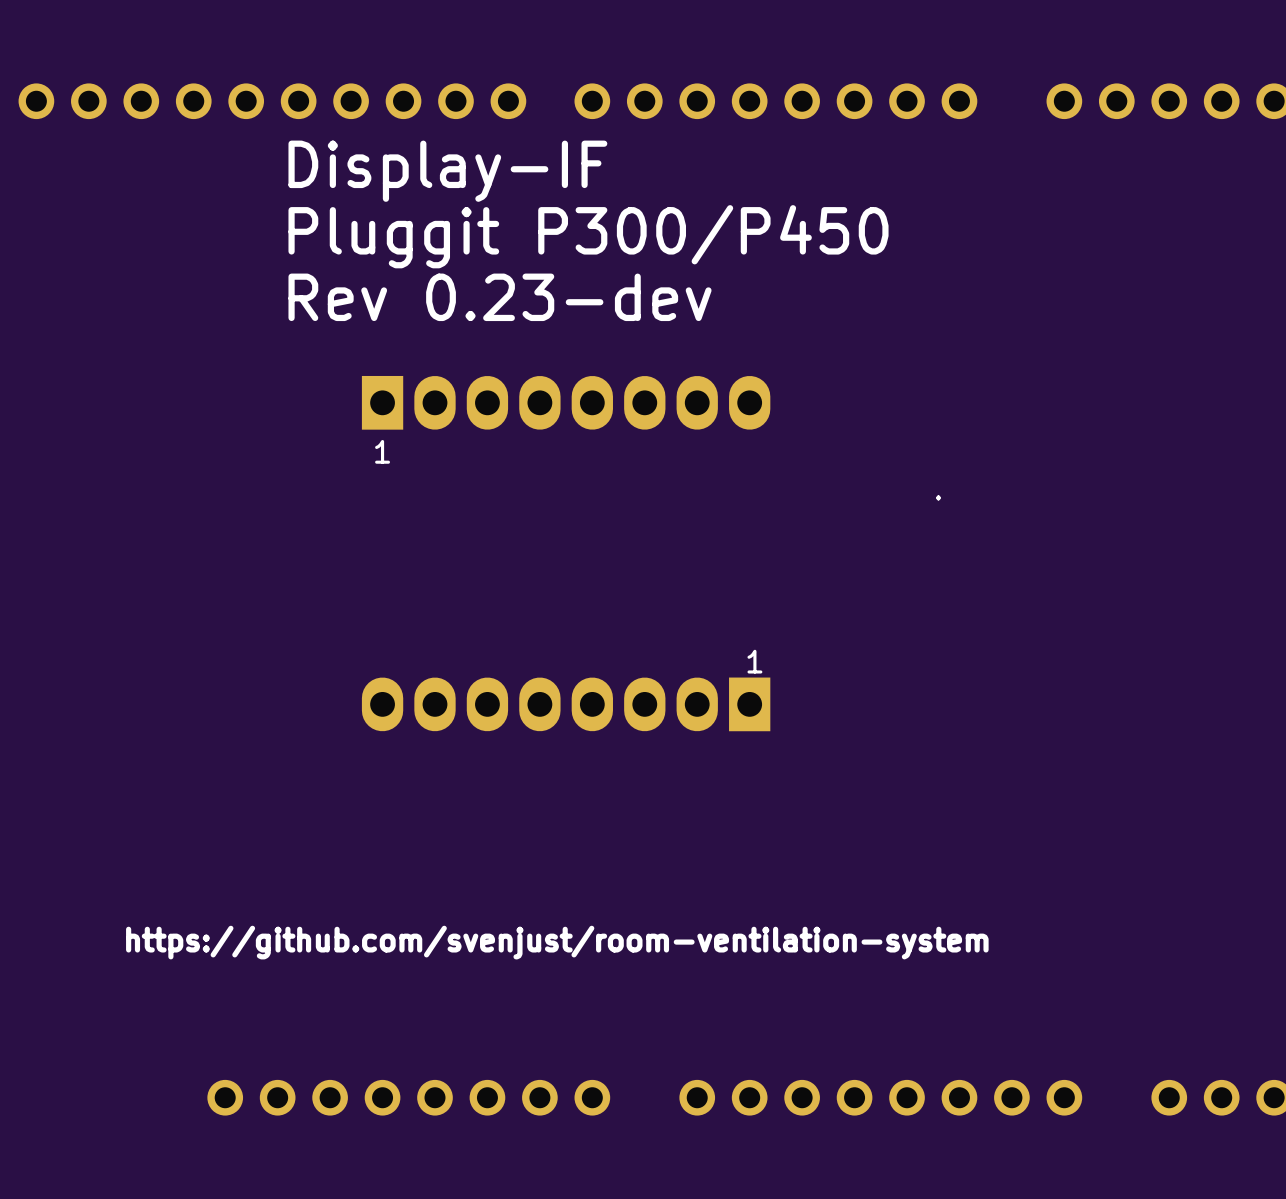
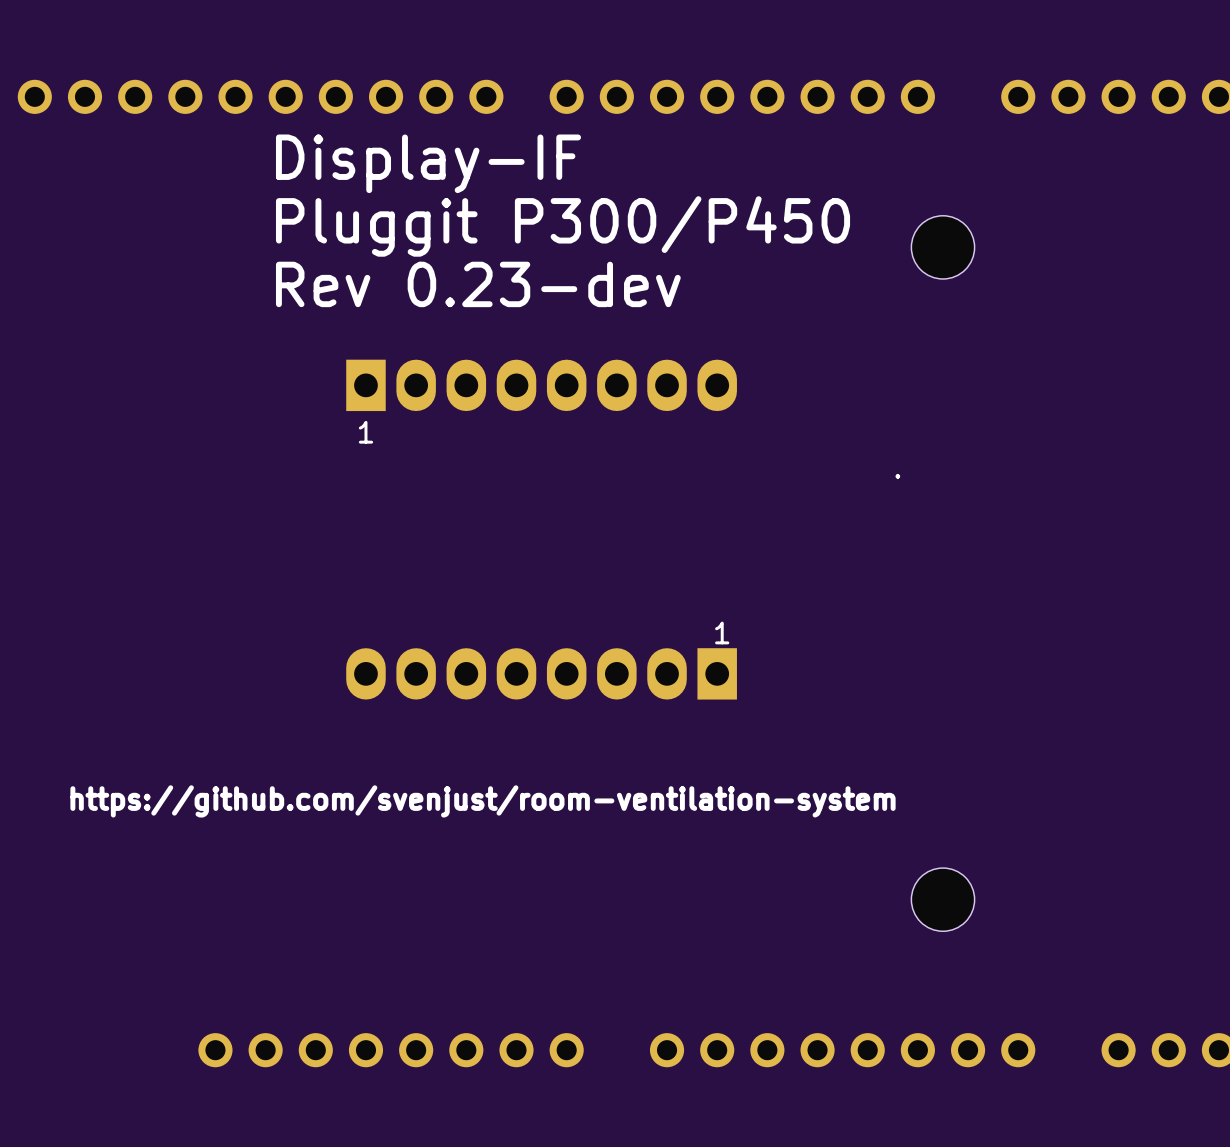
part: none -> (942, 247)
part: none -> (942, 899)
text position: https://github.com/svenjust/room-ventilation-system (557, 942) -> https://github.com/svenjust/room-ventilation-system (483, 801)

